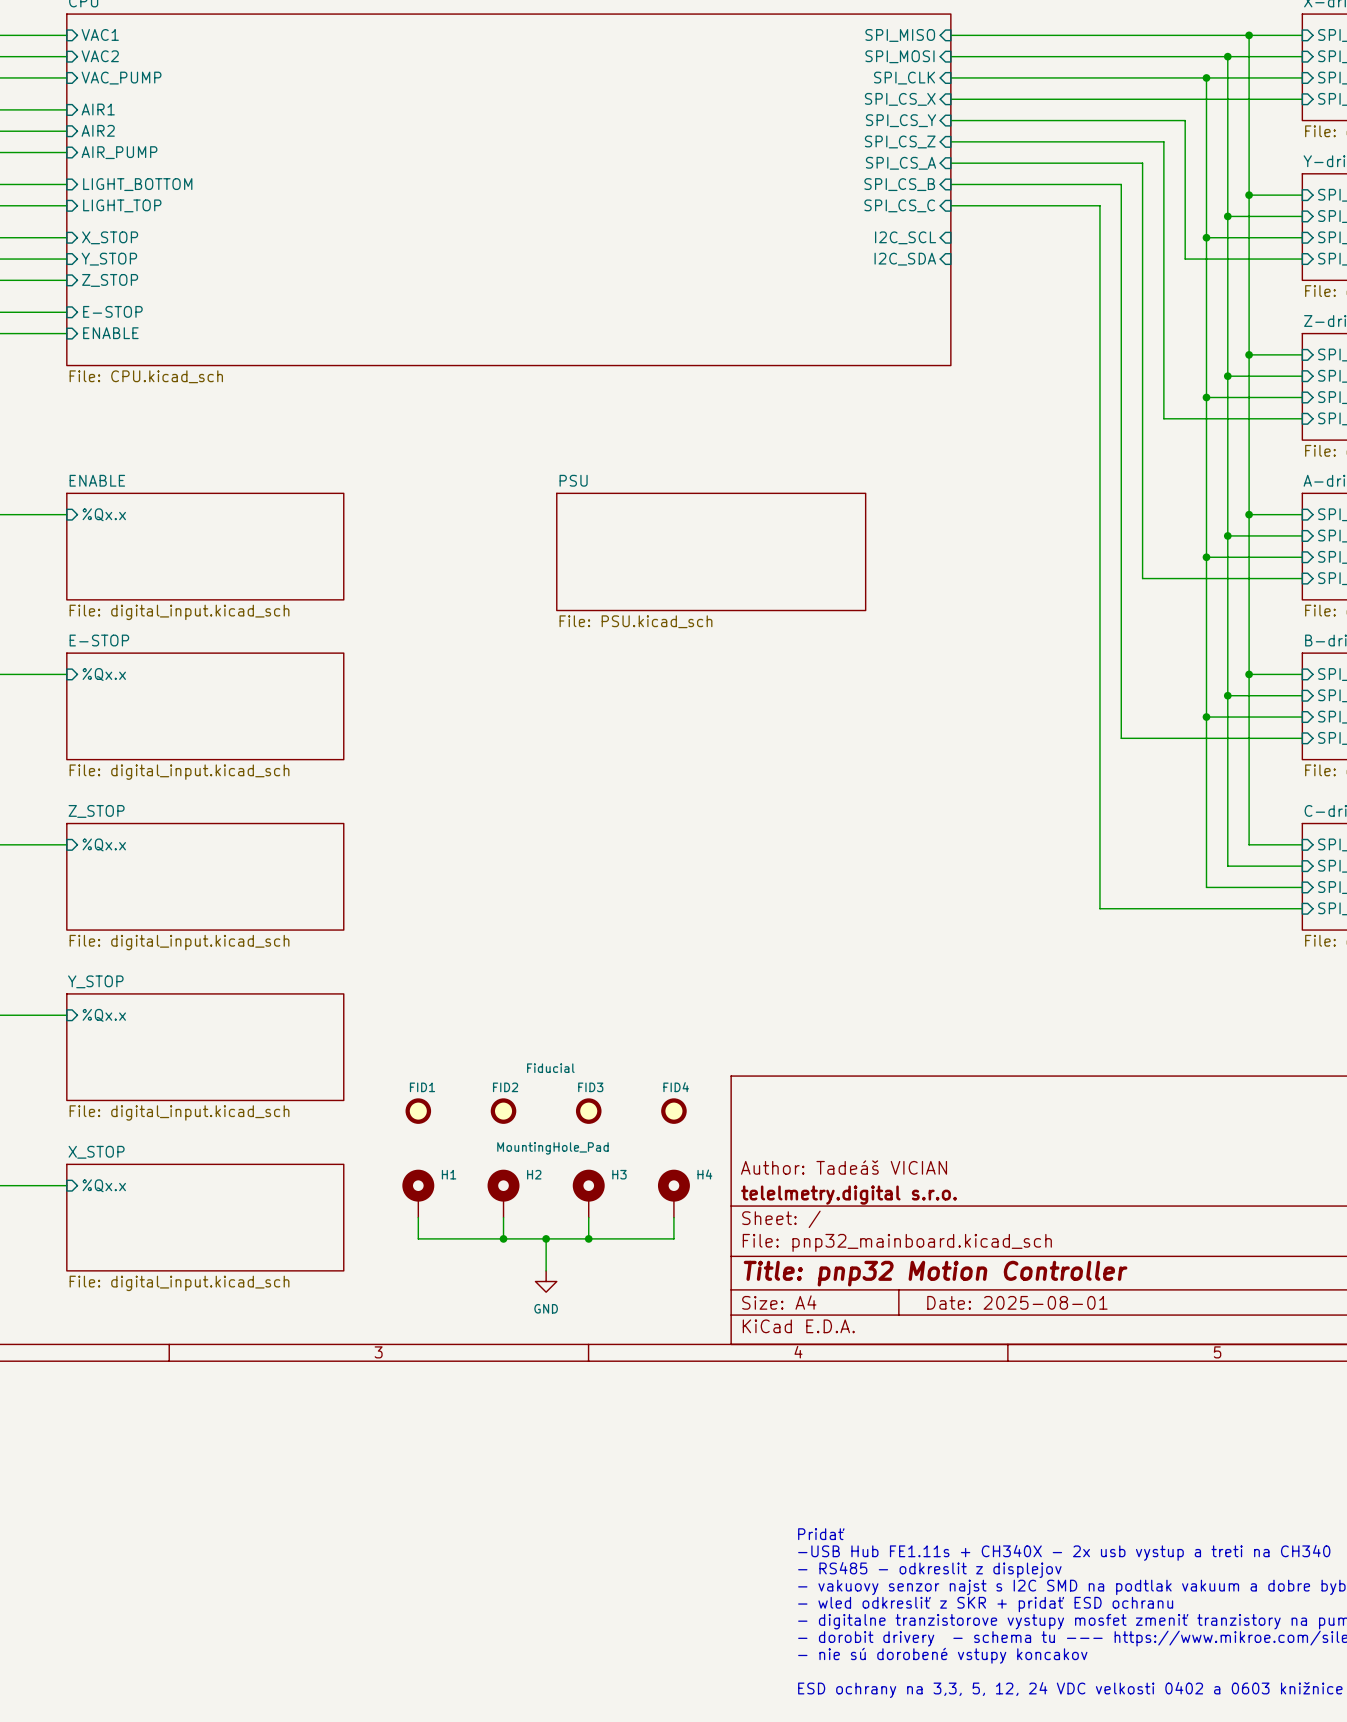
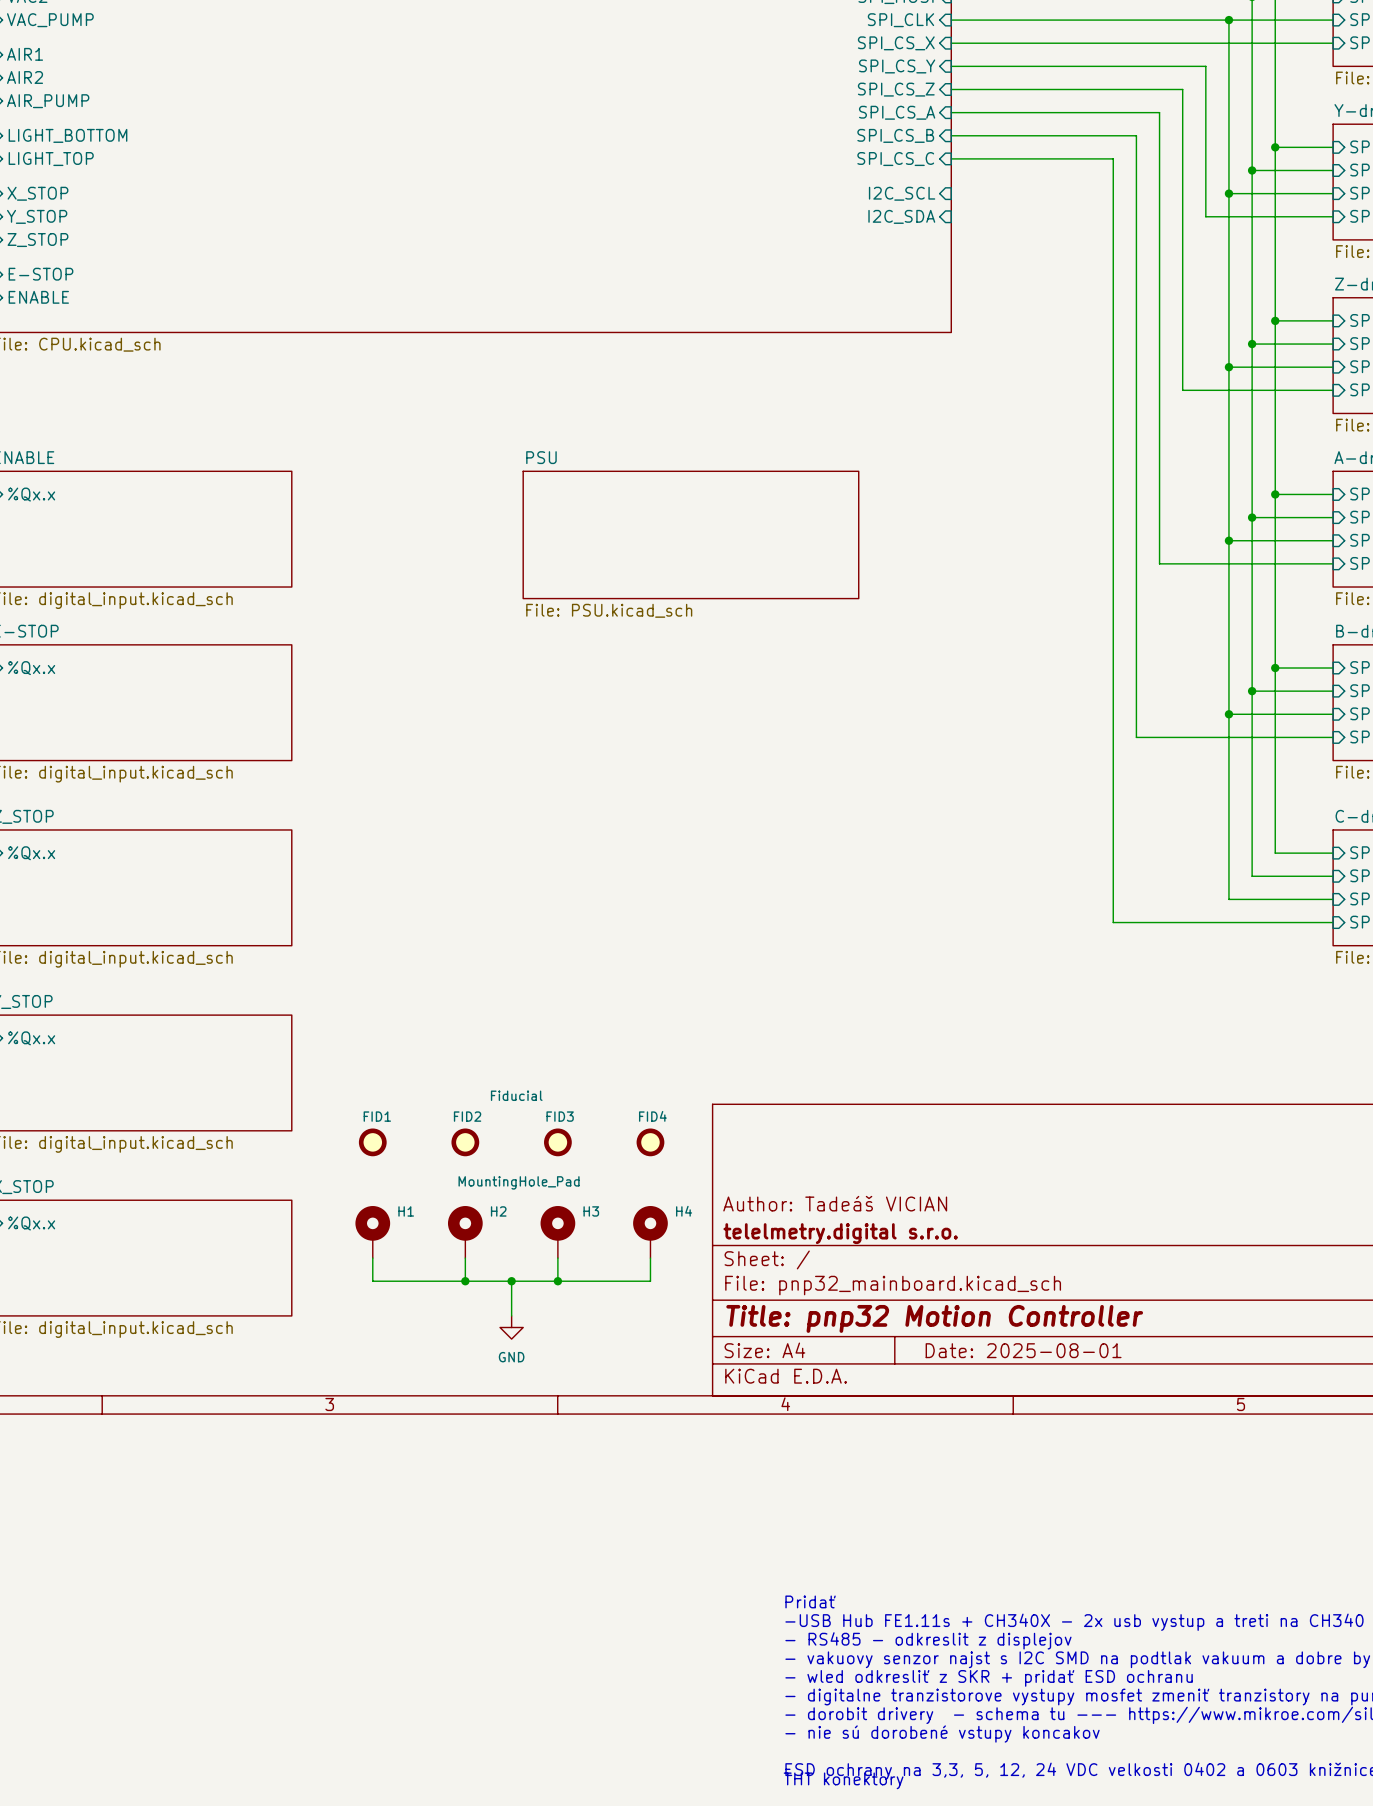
text: none -> THT konektory (843, 1780)

